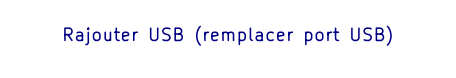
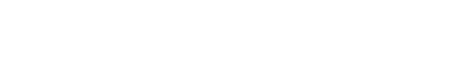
text: Rajouter USB (remplacer port USB) (227, 35) -> none

